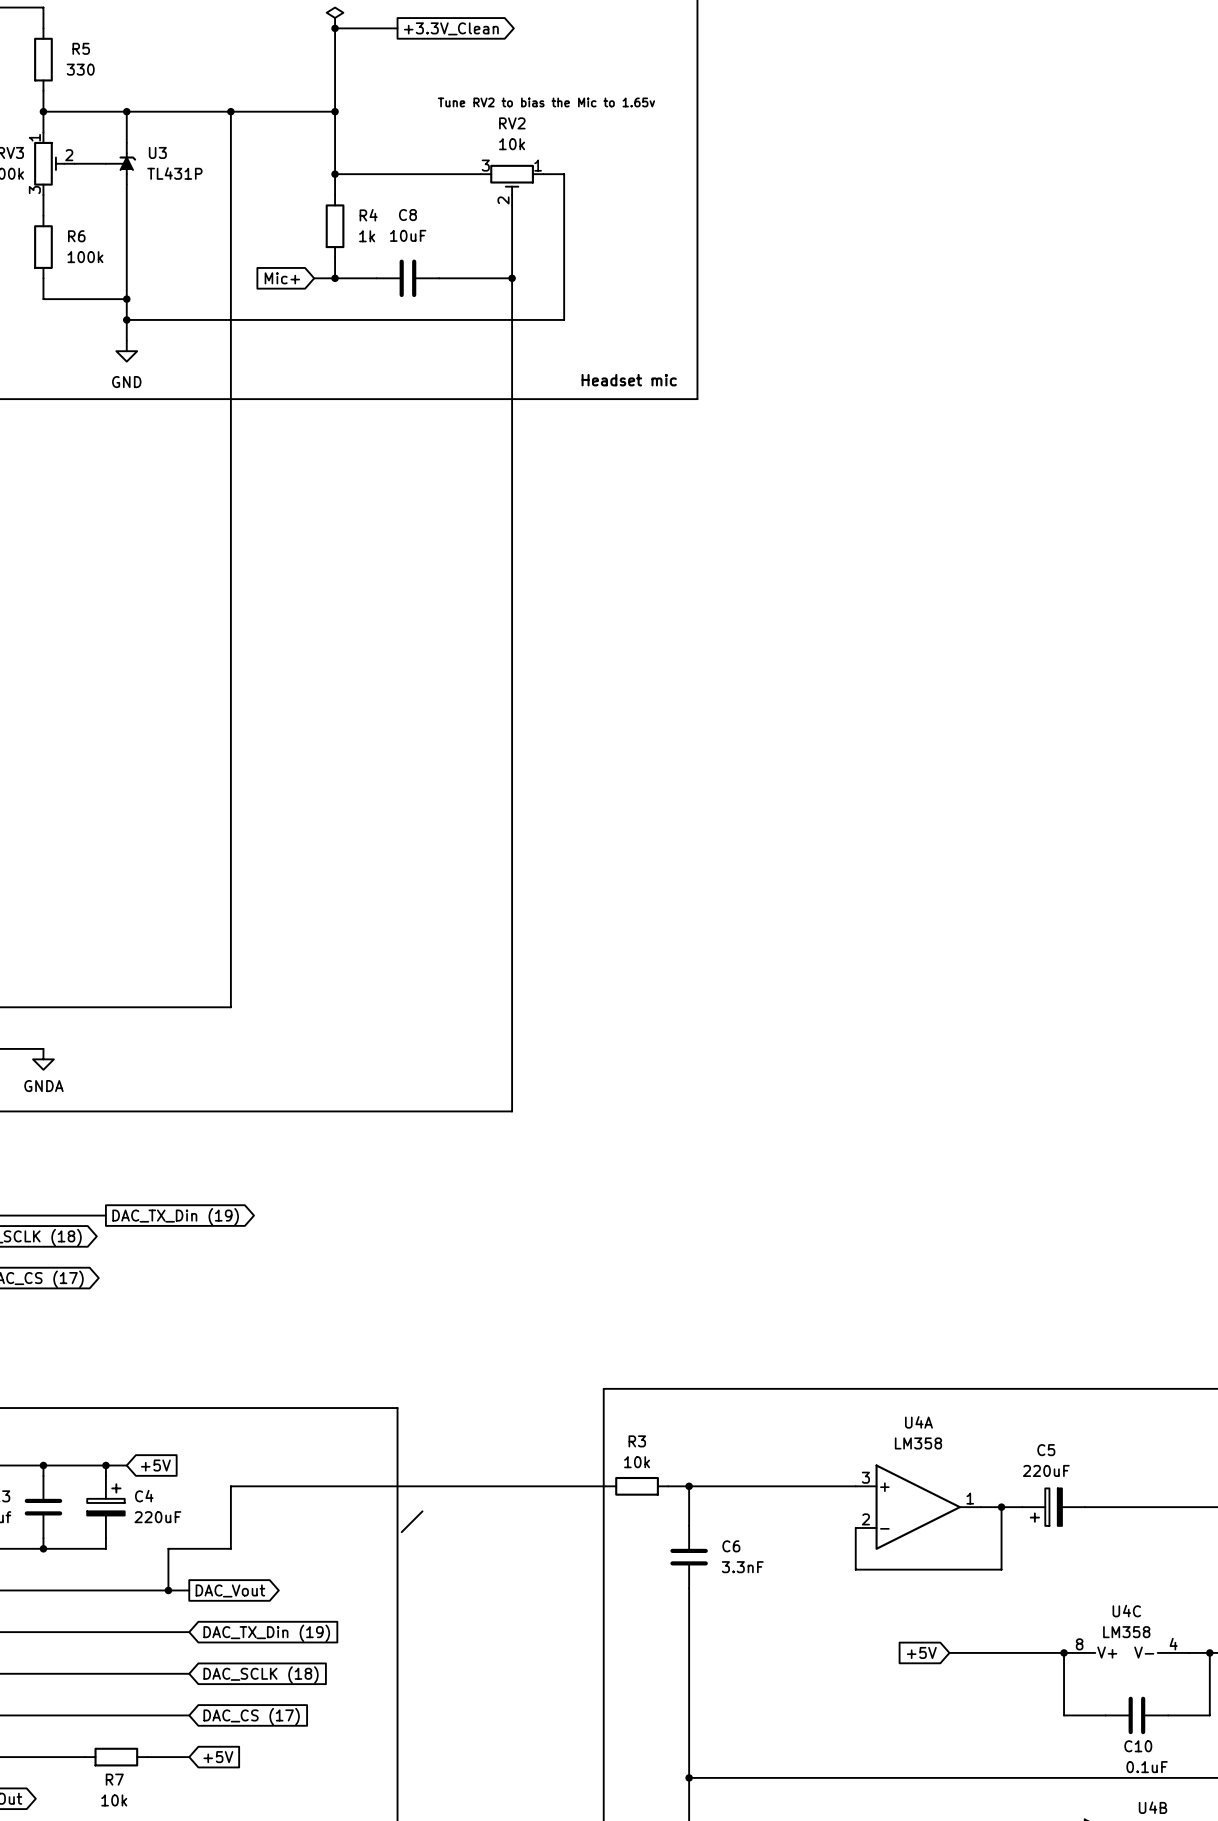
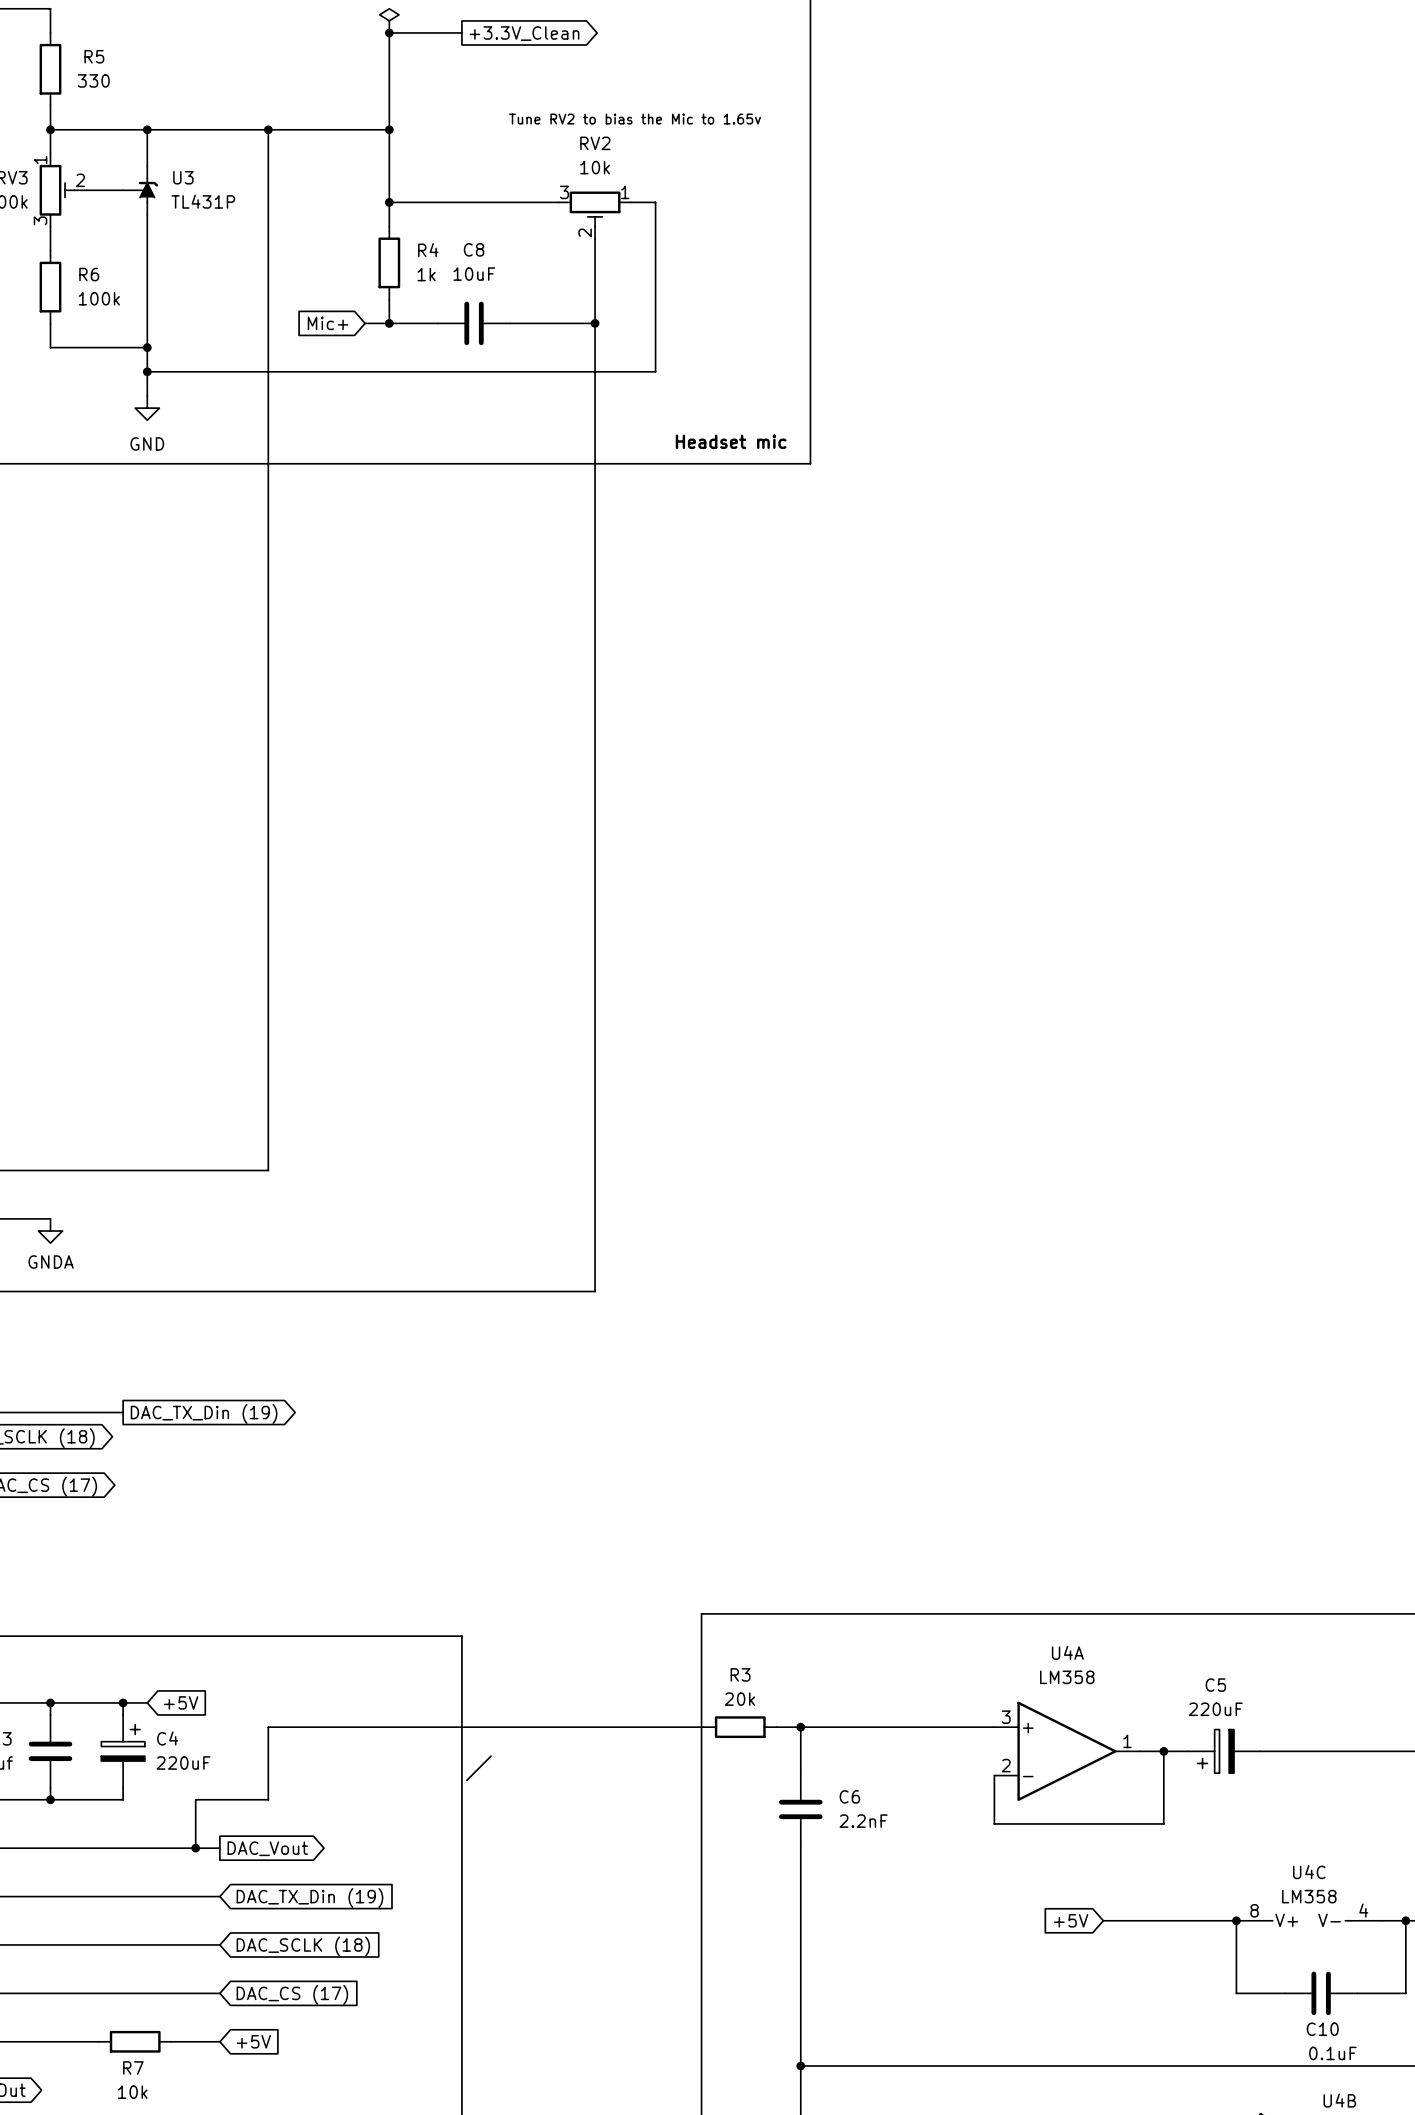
R3 value: 10k (637, 1462) -> 20k (739, 1699)
C6 value: 3.3nF (742, 1567) -> 2.2nF (863, 1821)

